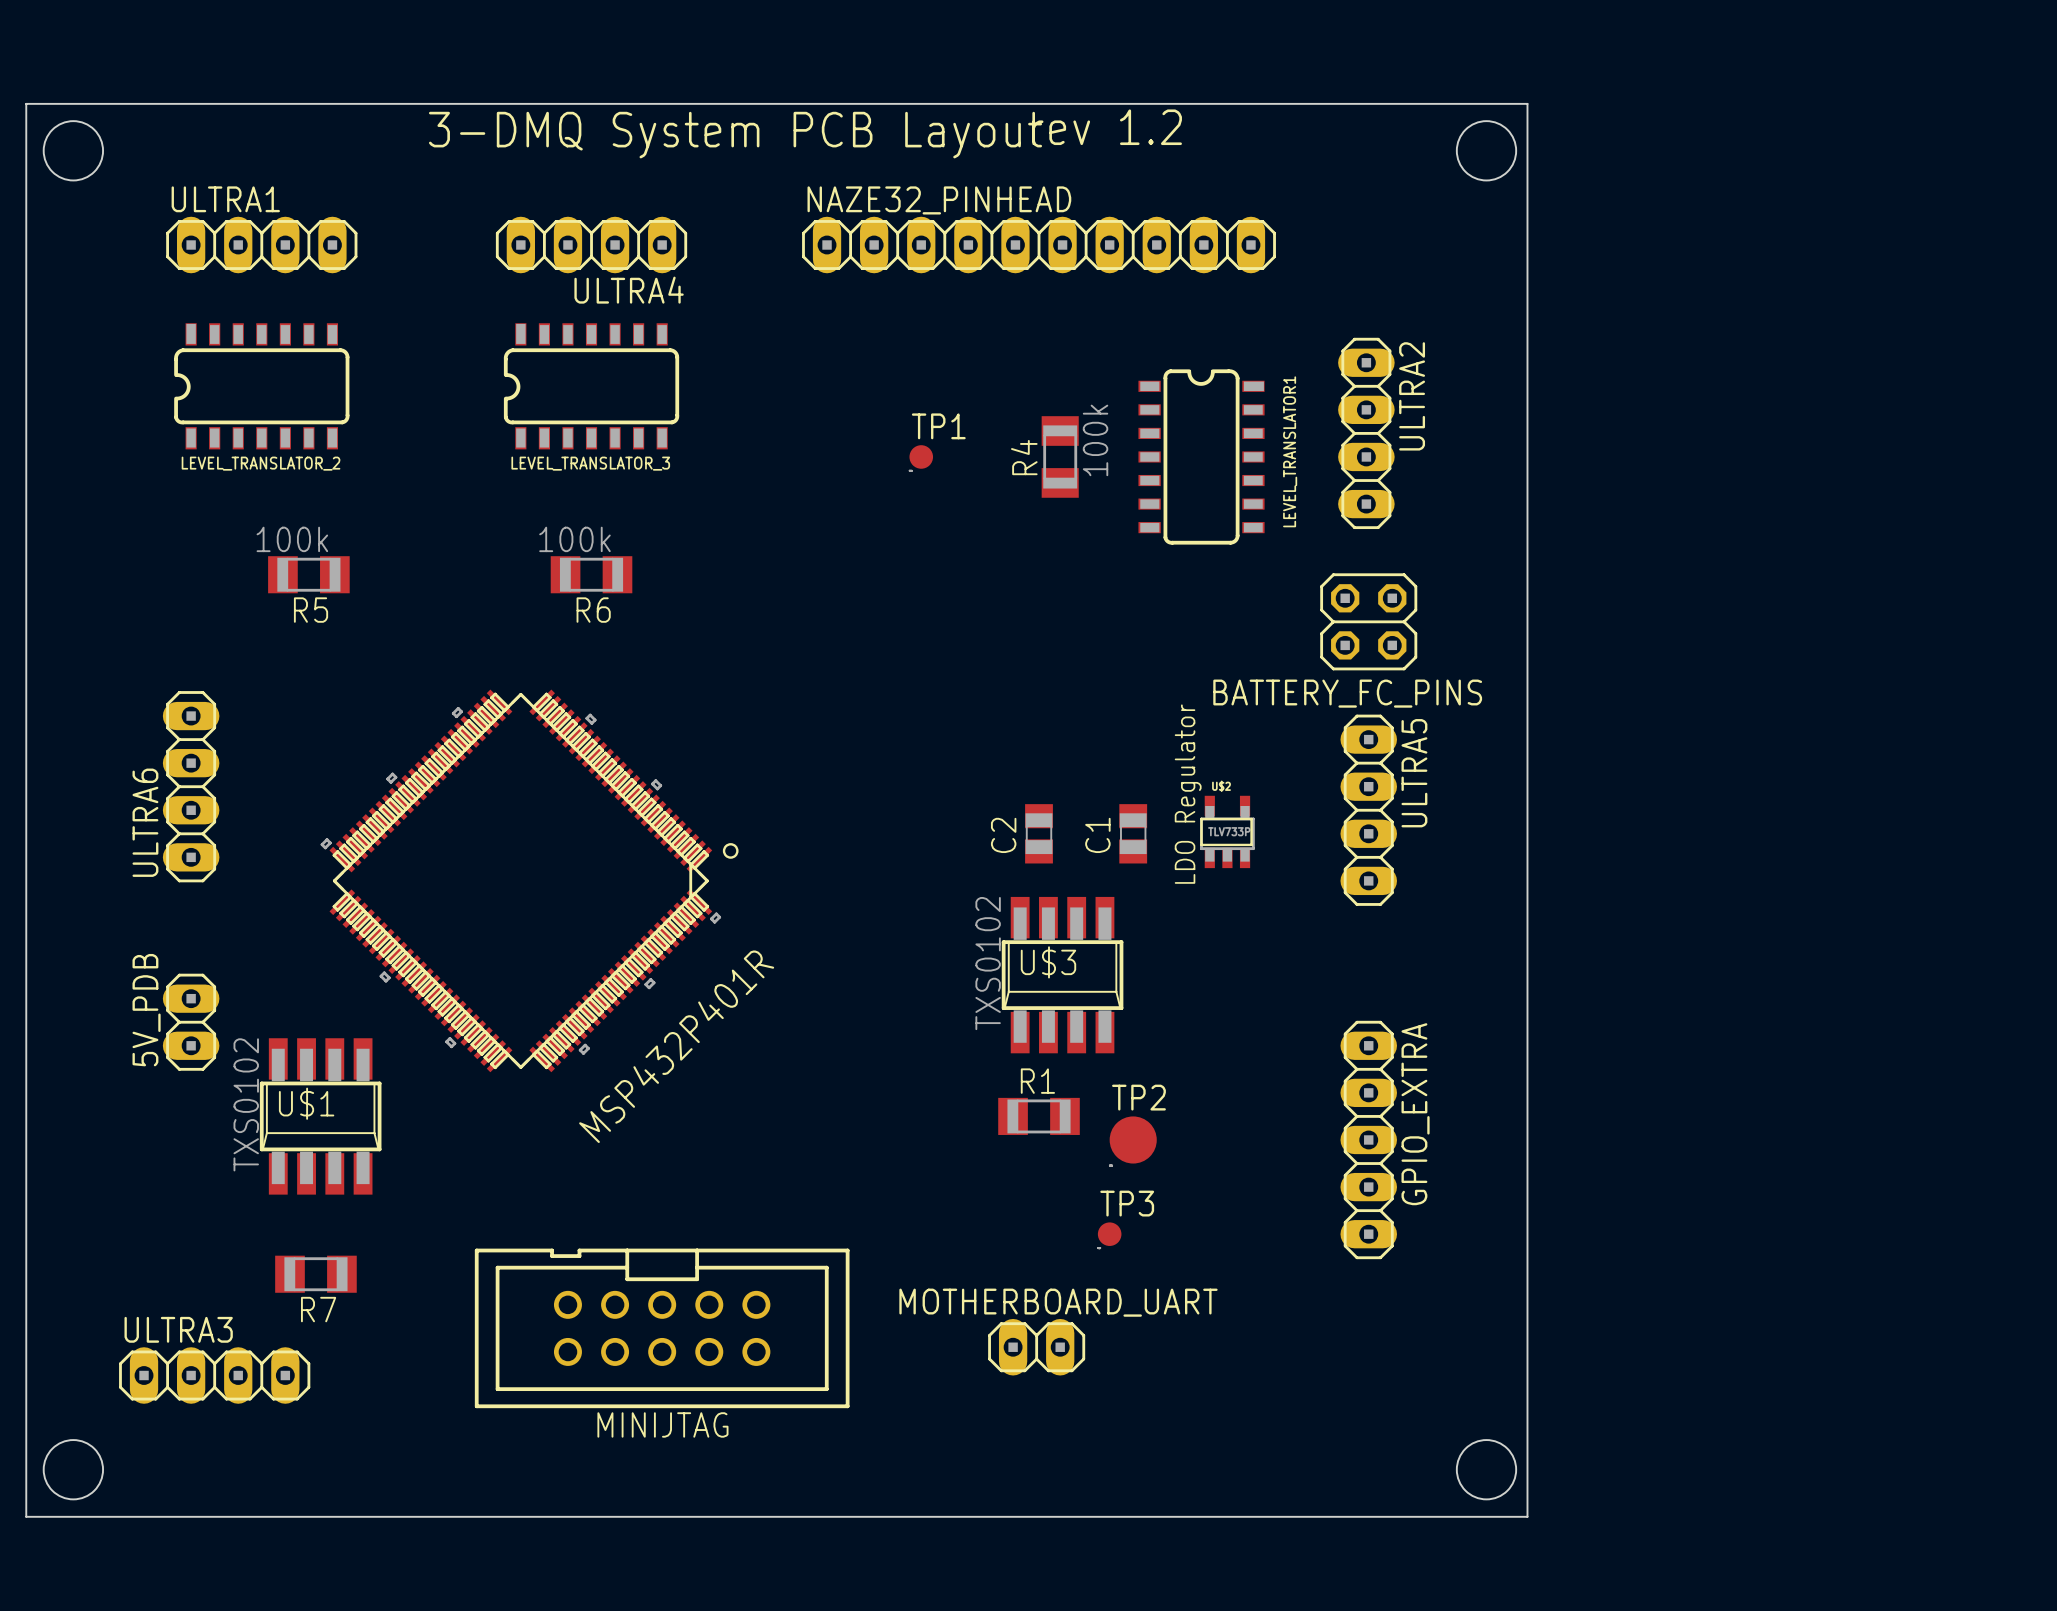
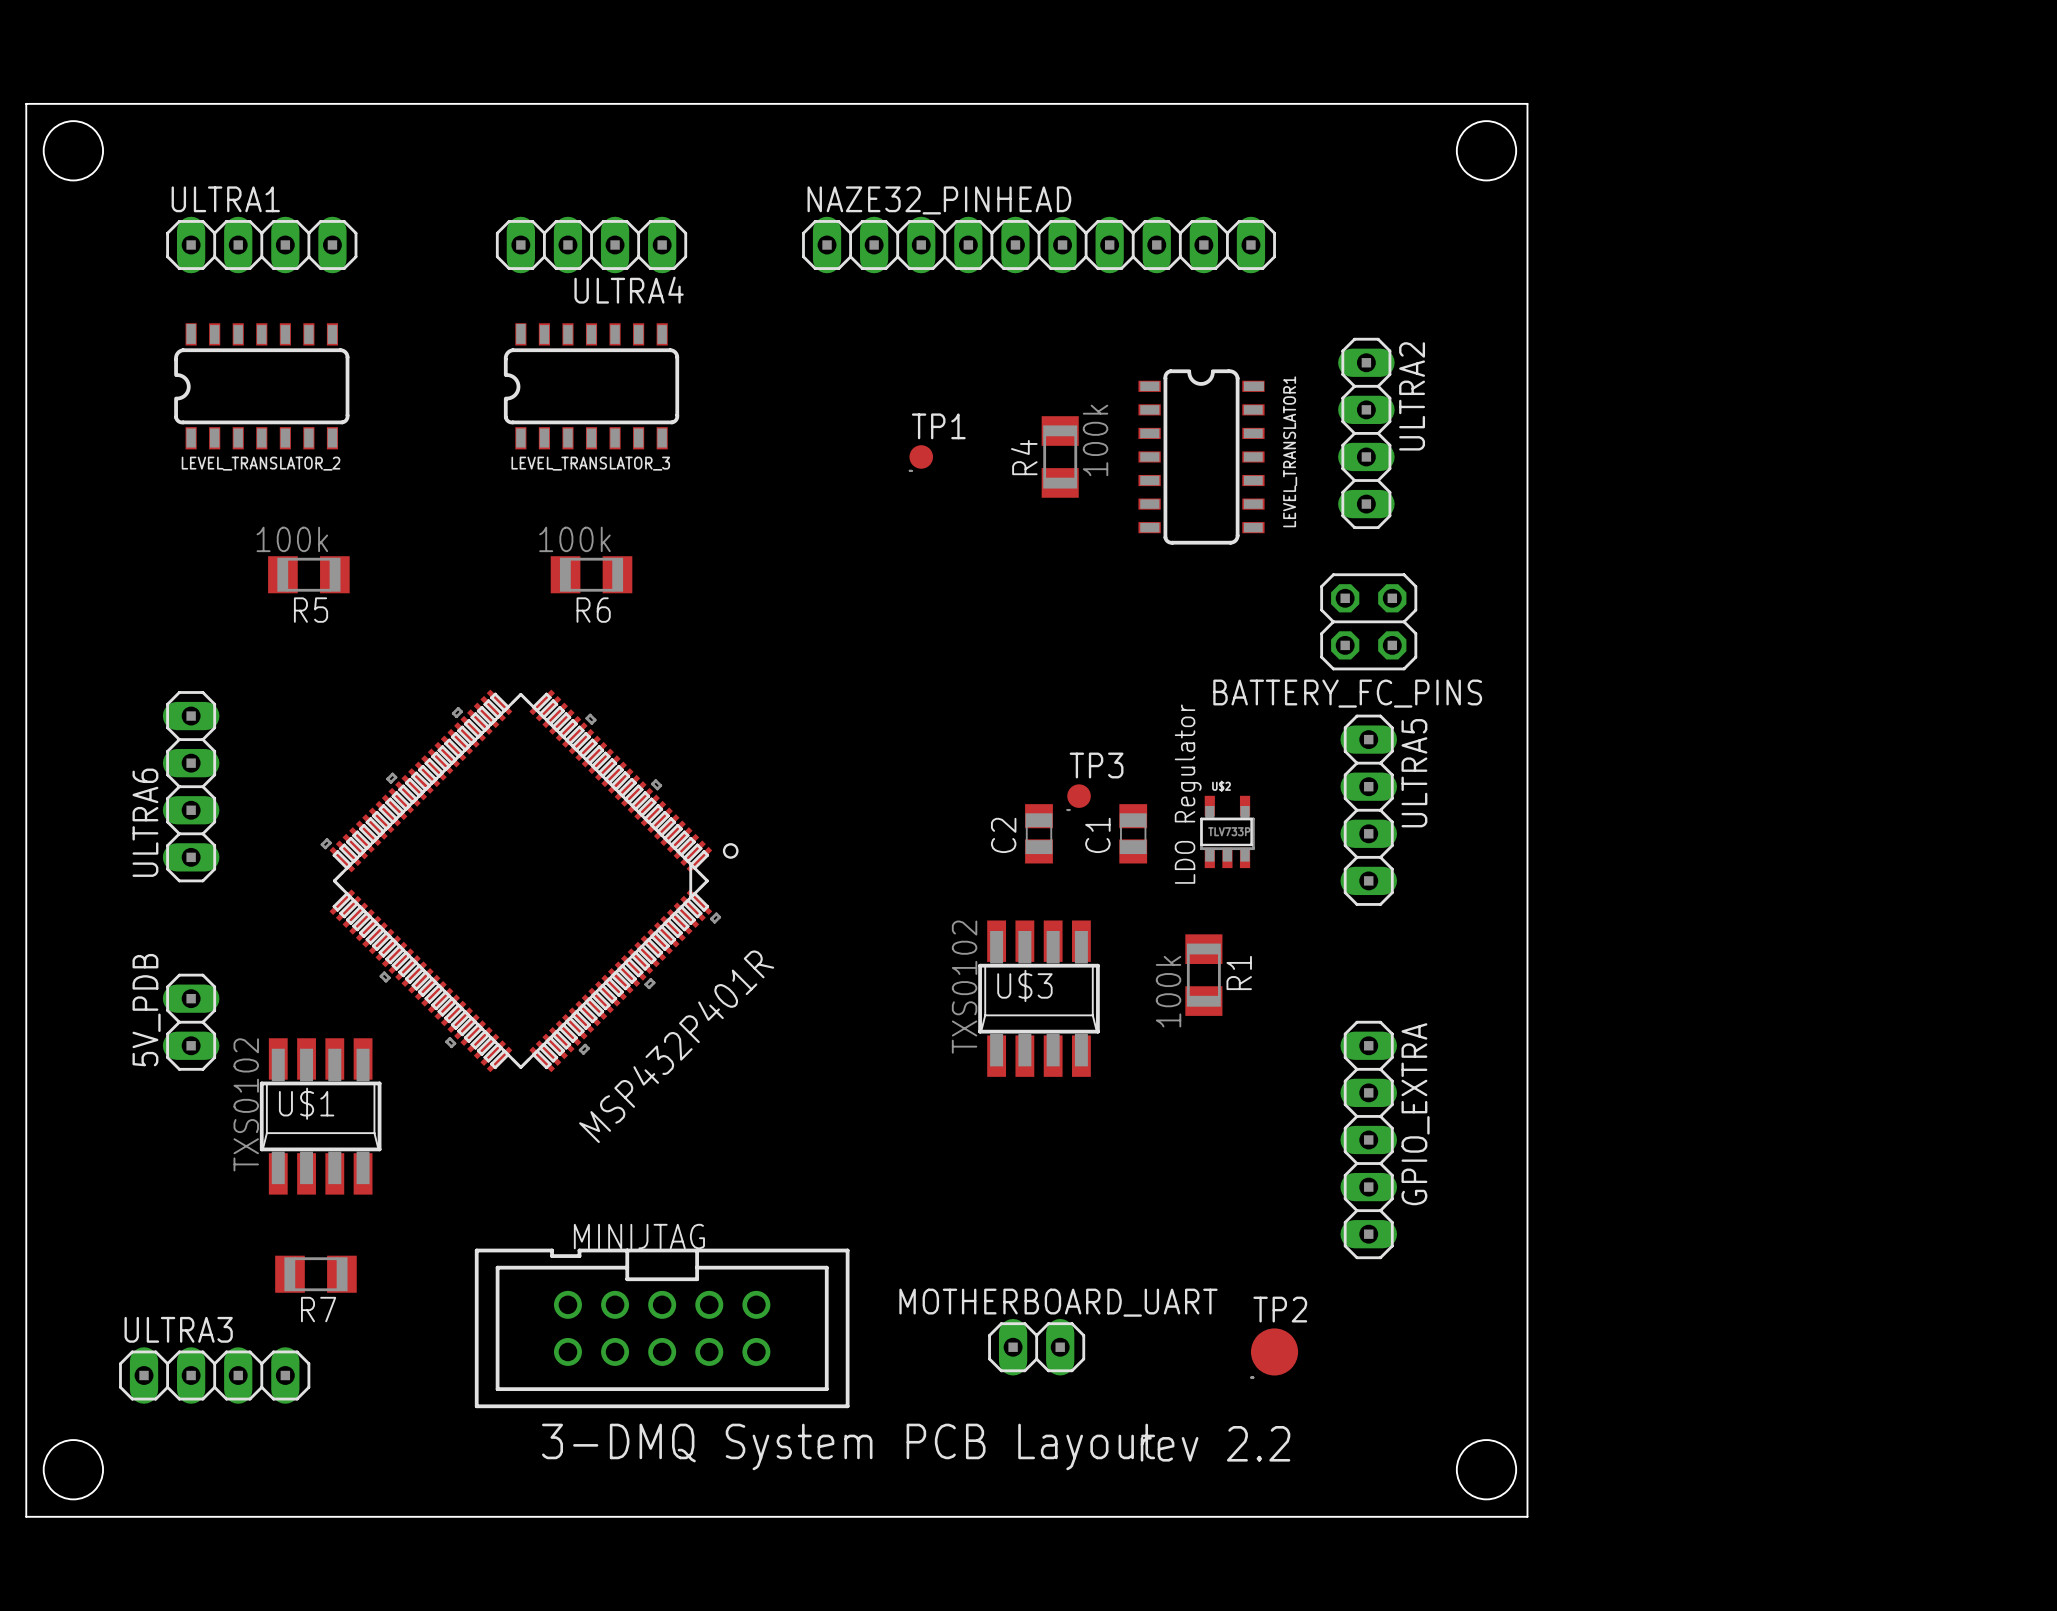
text: rev 1.2 (1107, 127) -> none
text: 3-DMQ System PCB Layout (735, 135) -> none
U$3 position: (1062, 975) -> (1039, 998)
R1 value: none -> 100k (1168, 991)
R1 rotation: 0° (1039, 1116) -> 90° clockwise (1203, 975)
R1 position: (1039, 1116) -> (1203, 975)
TP2 position: (1133, 1139) -> (1274, 1351)
TP3 position: (1109, 1234) -> (1079, 796)
MINIJTAG name position: MINIJTAG (662, 1424) -> MINIJTAG (639, 1236)
text: none -> rev 2.2 (1215, 1443)
text: none -> 3-DMQ System PCB Layout (848, 1446)

